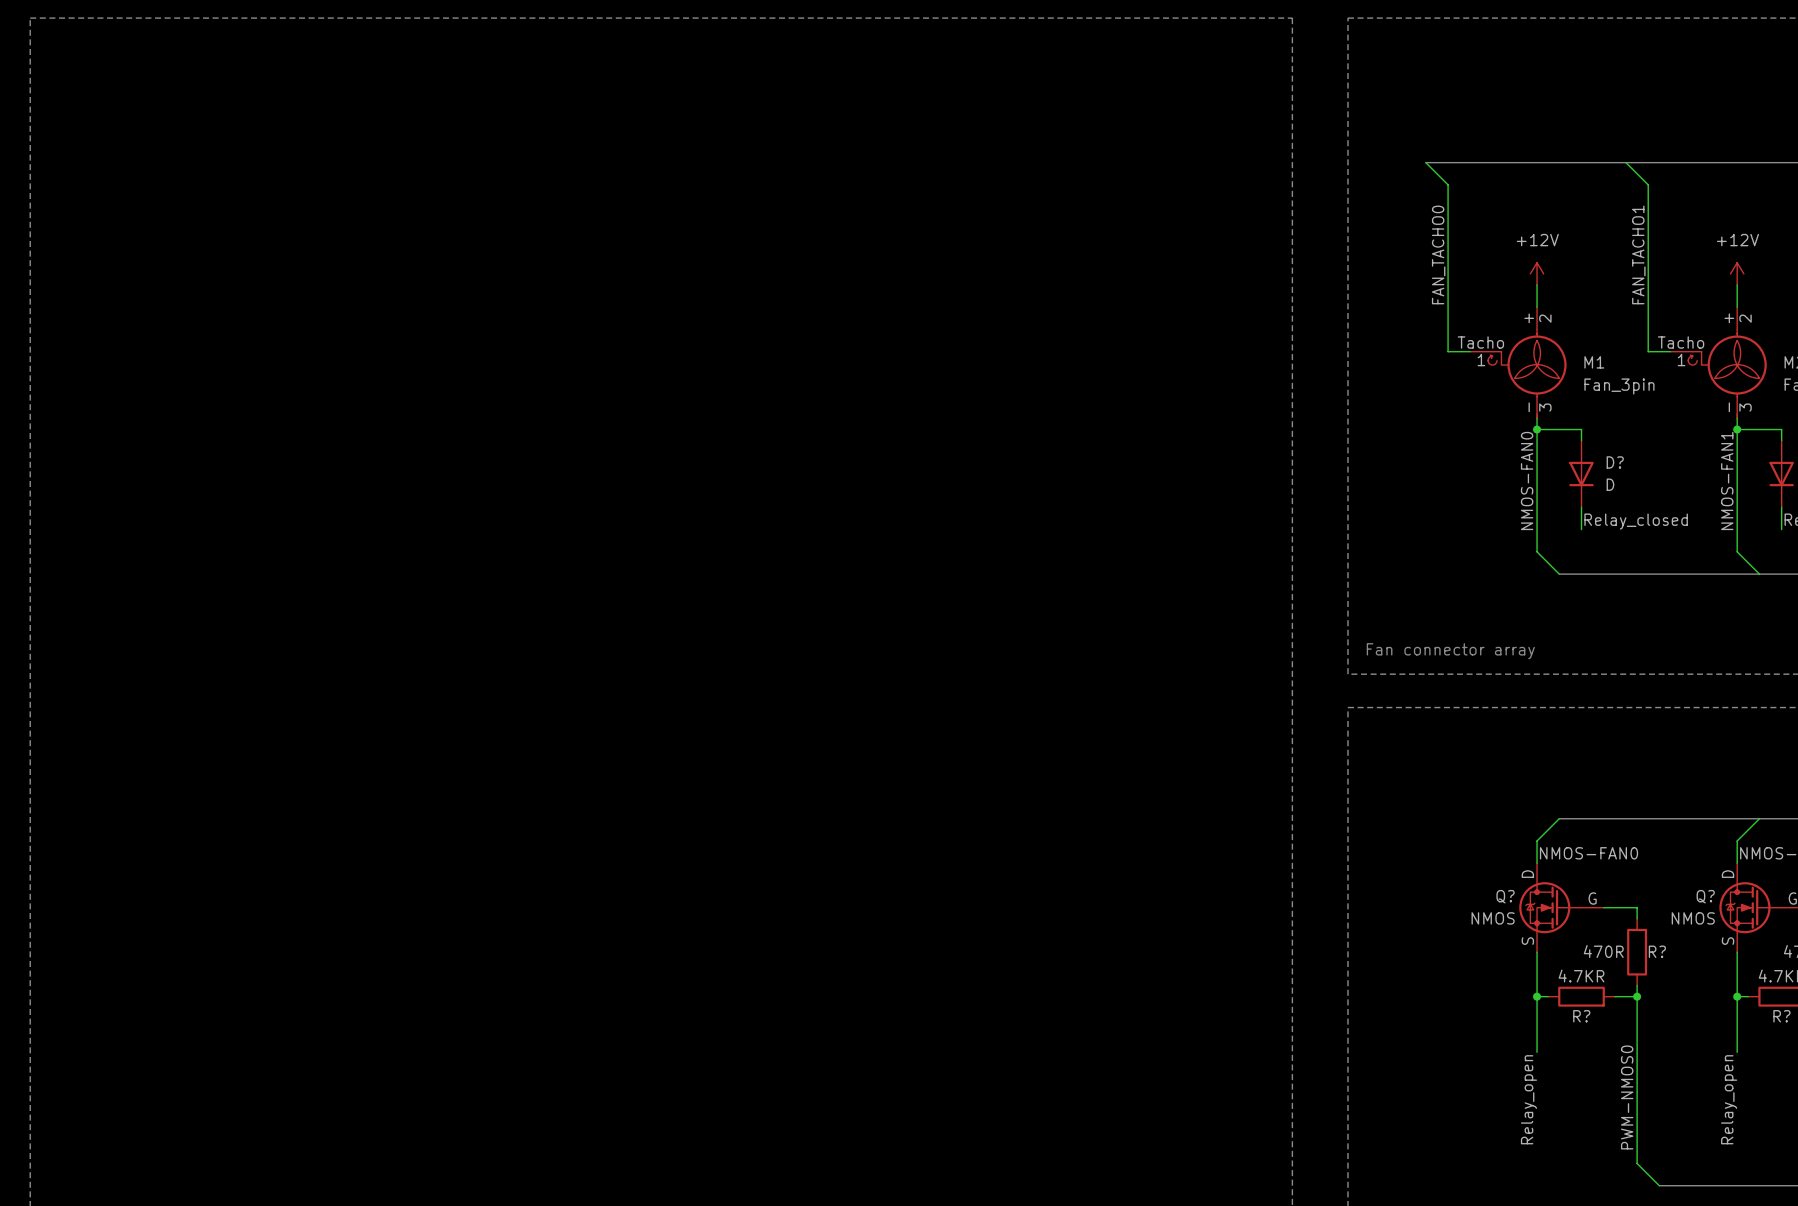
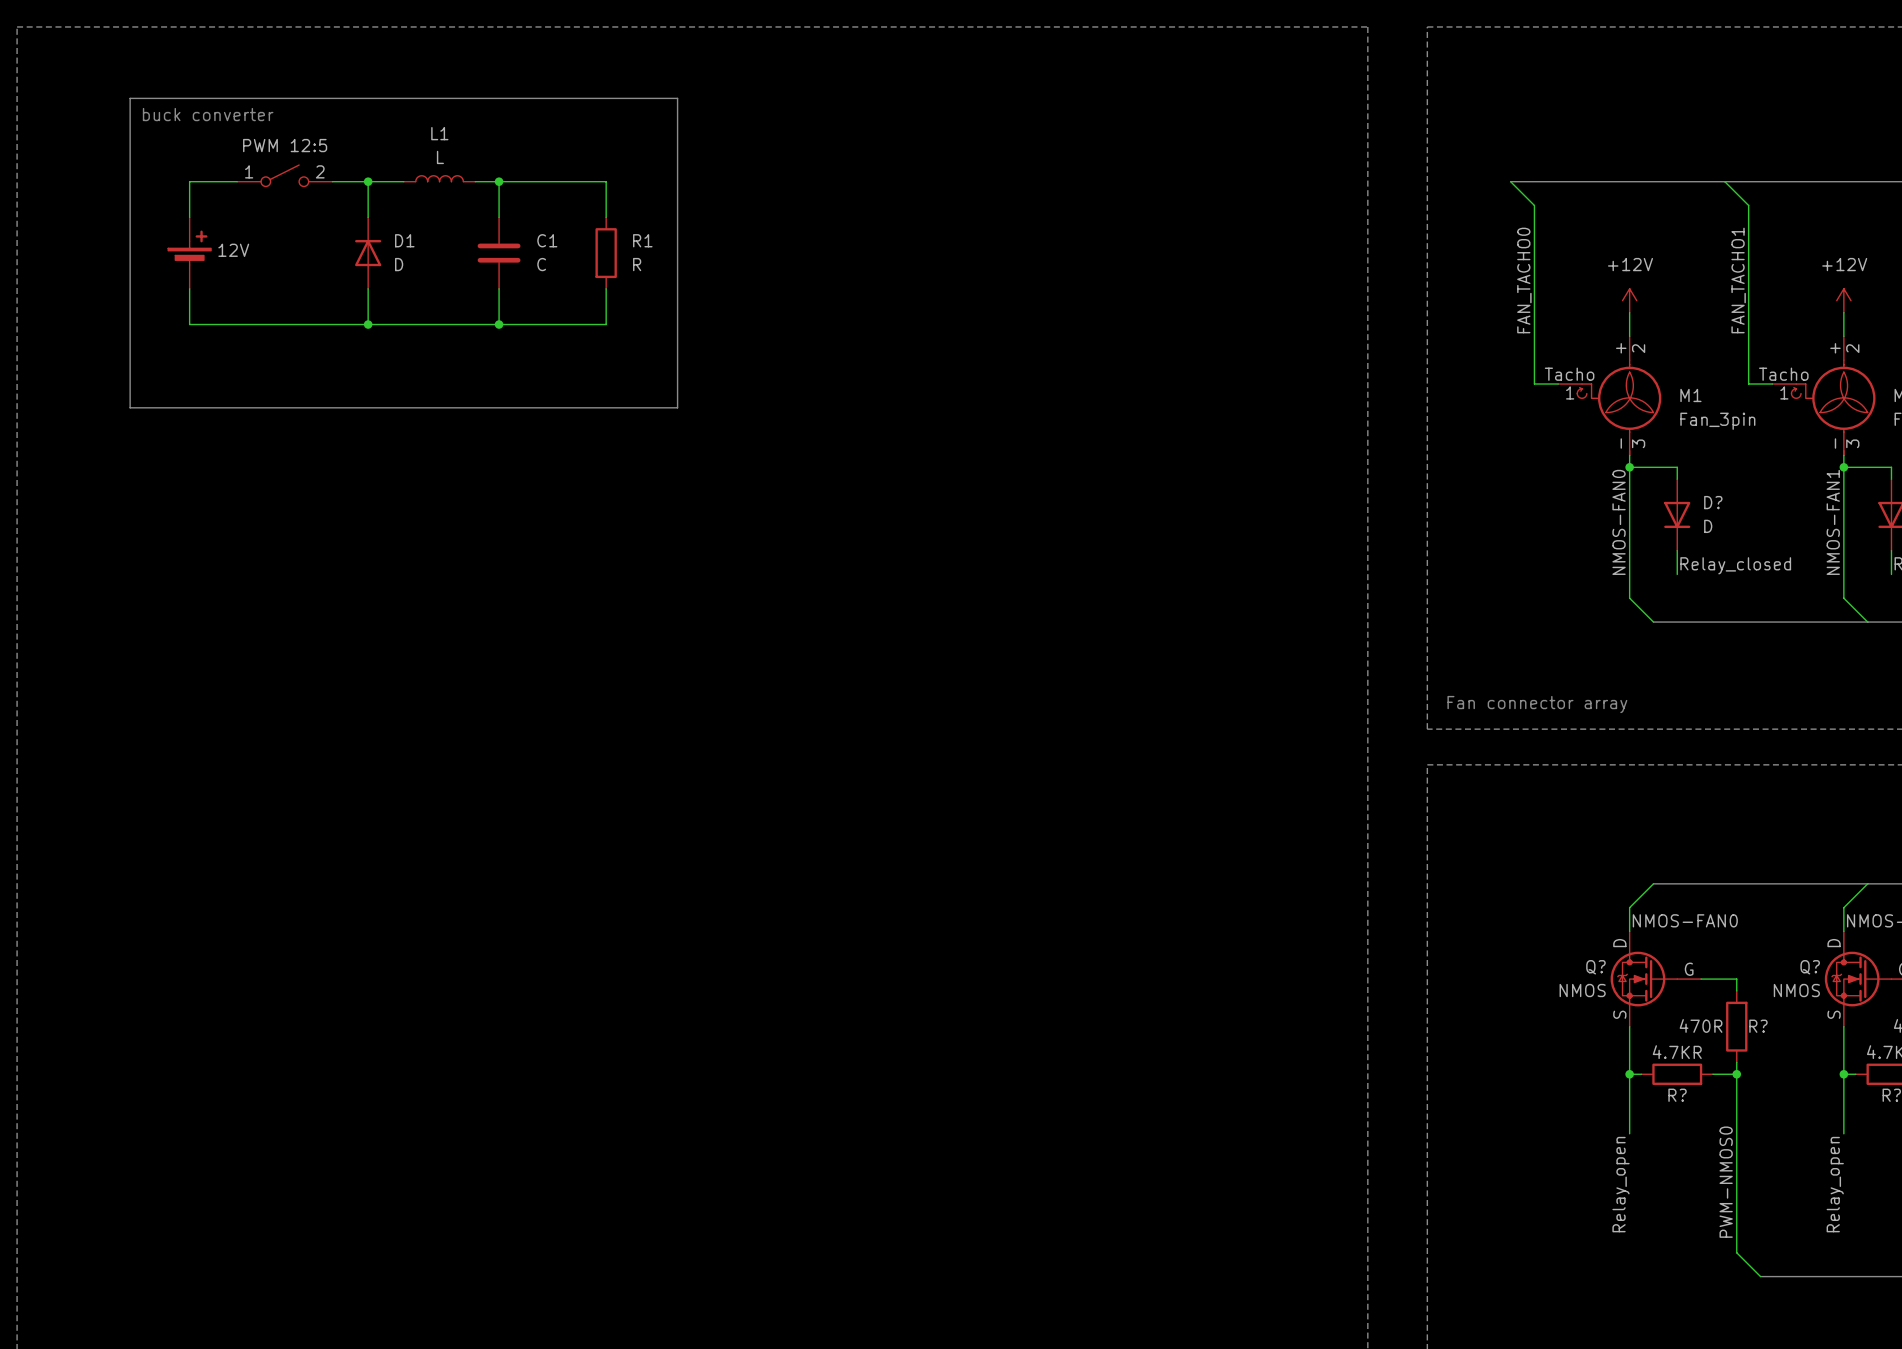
line: none -> (130, 98) (677, 98) (677, 407) (130, 407) (130, 98)
text: none -> buck converter (208, 114)
part: none -> PWM 12:5 (284, 175)
L1: none -> L (439, 178)
wire: none -> (237, 181) (189, 181) (189, 217)
wire: none -> (332, 181) (403, 181)
wire: none -> (368, 181) (368, 217)
junction: none -> (368, 181)
wire: none -> (475, 181) (606, 181) (606, 217)
wire: none -> (499, 181) (499, 217)
junction: none -> (499, 181)
part: none -> 12V (189, 253)
D1: none -> D (368, 253)
C1: none -> C (499, 253)
R1: none -> R (606, 253)
wire: none -> (189, 288) (189, 324) (606, 324) (606, 288)
wire: none -> (368, 288) (368, 324)
wire: none -> (499, 288) (499, 324)
junction: none -> (368, 324)
junction: none -> (499, 324)

